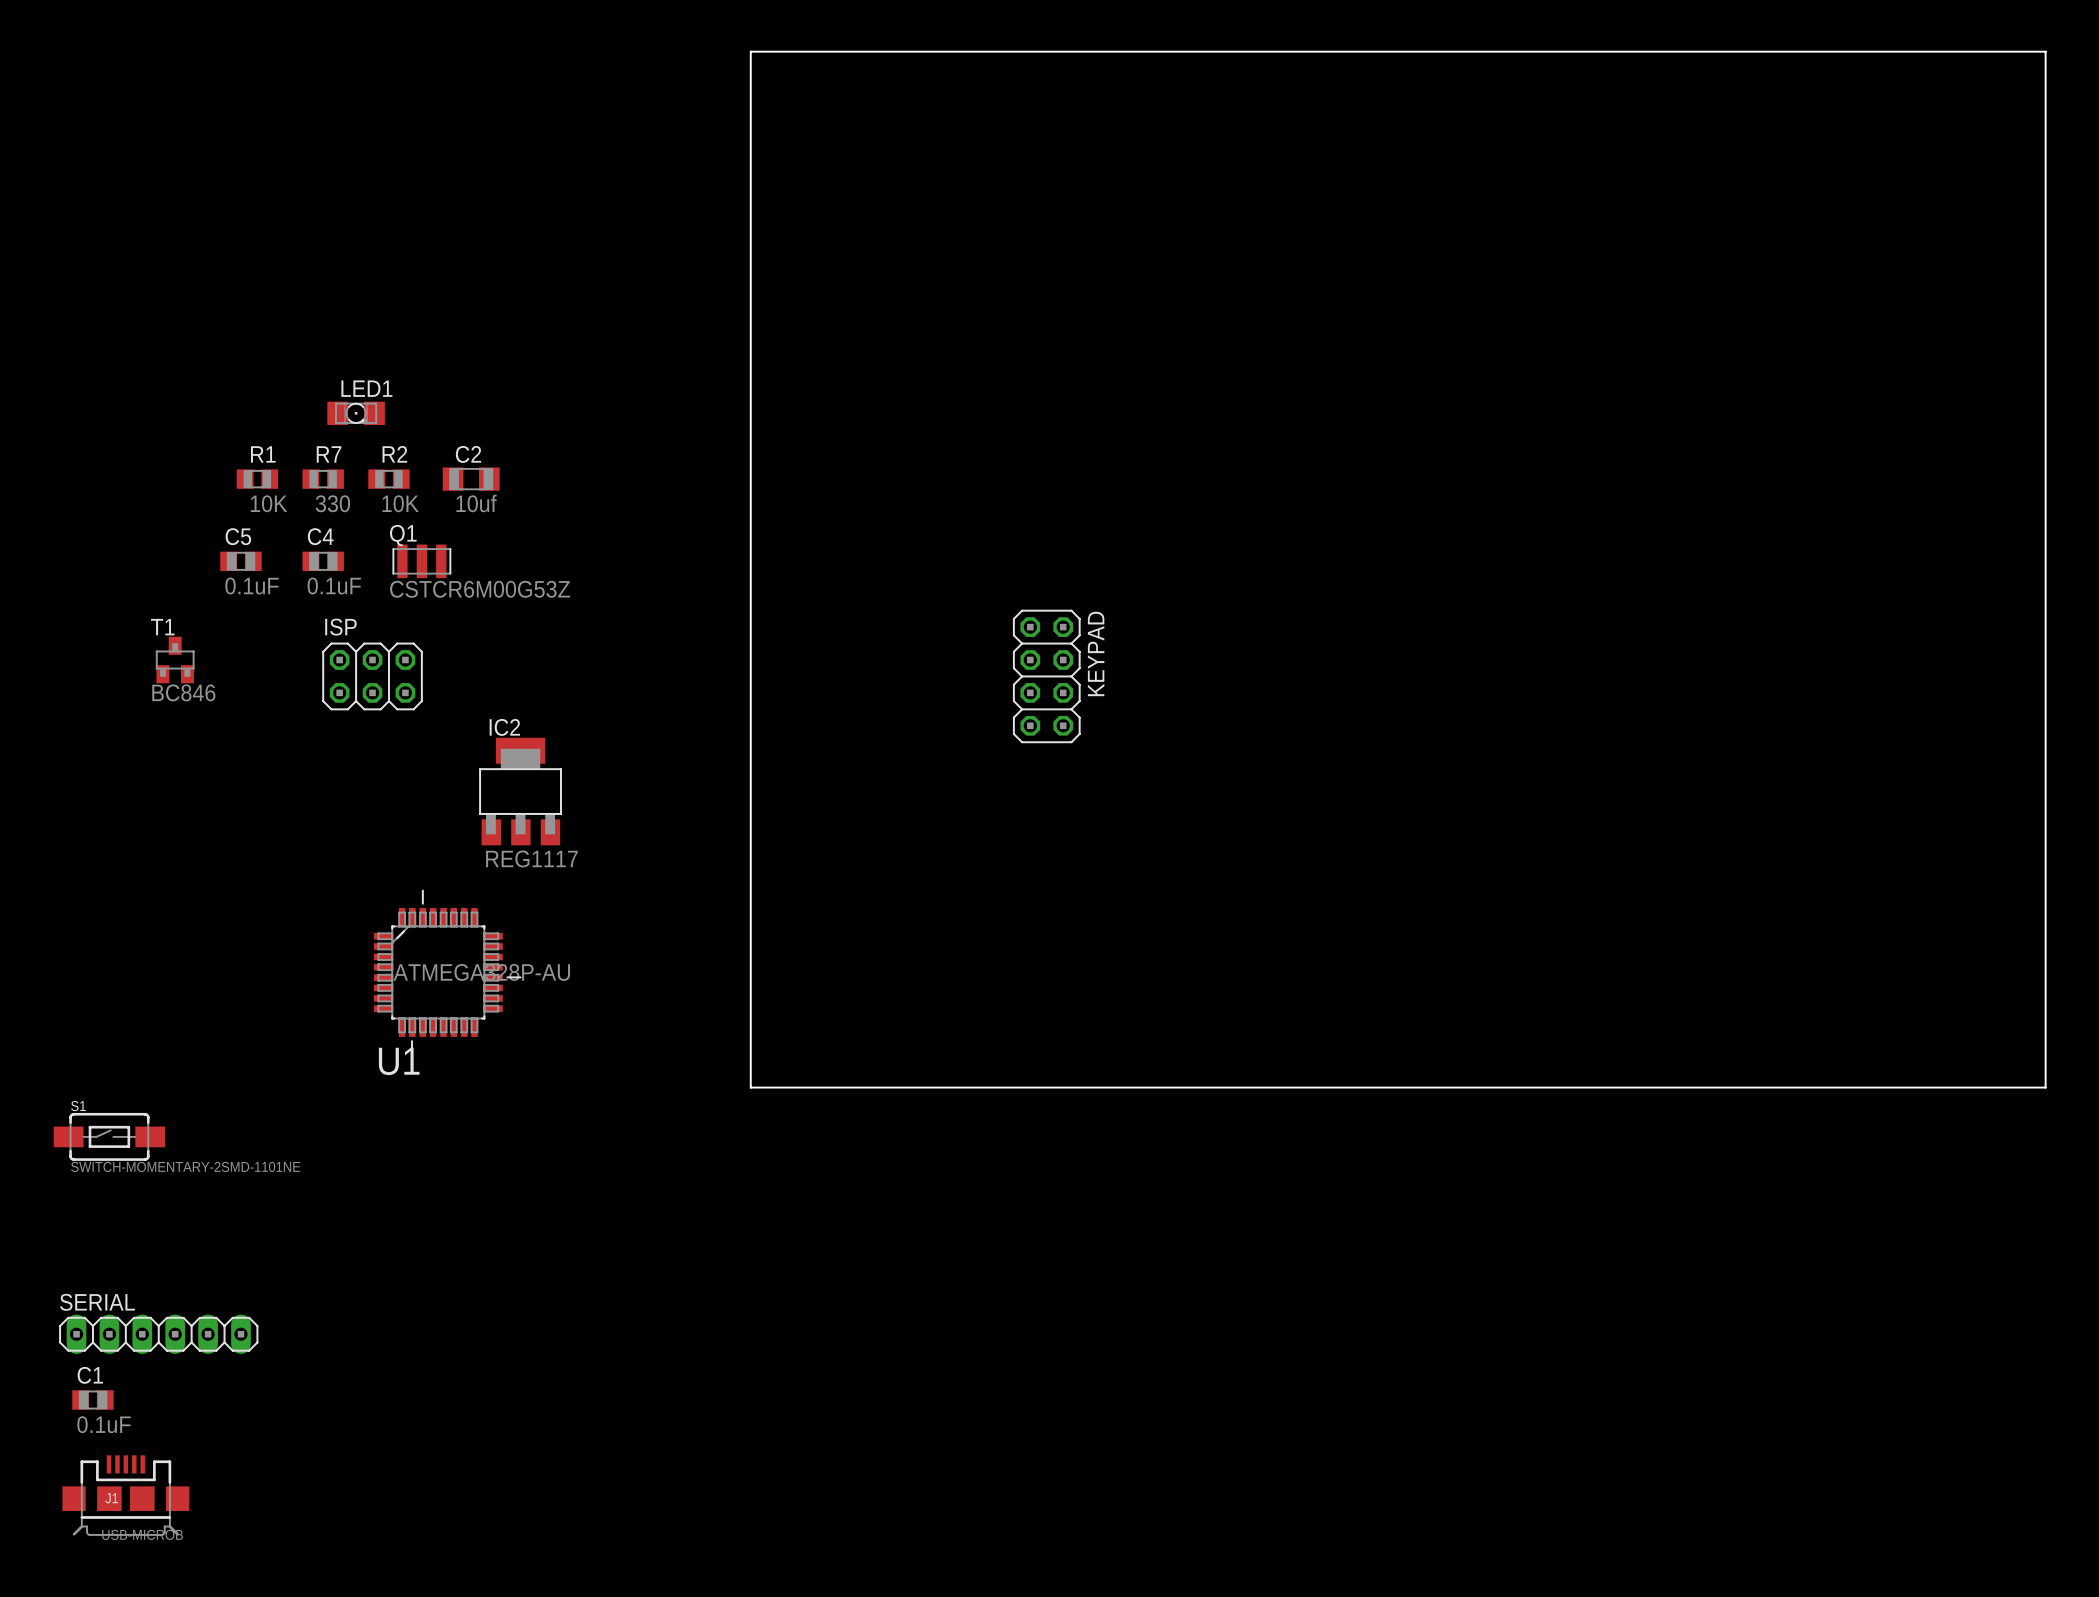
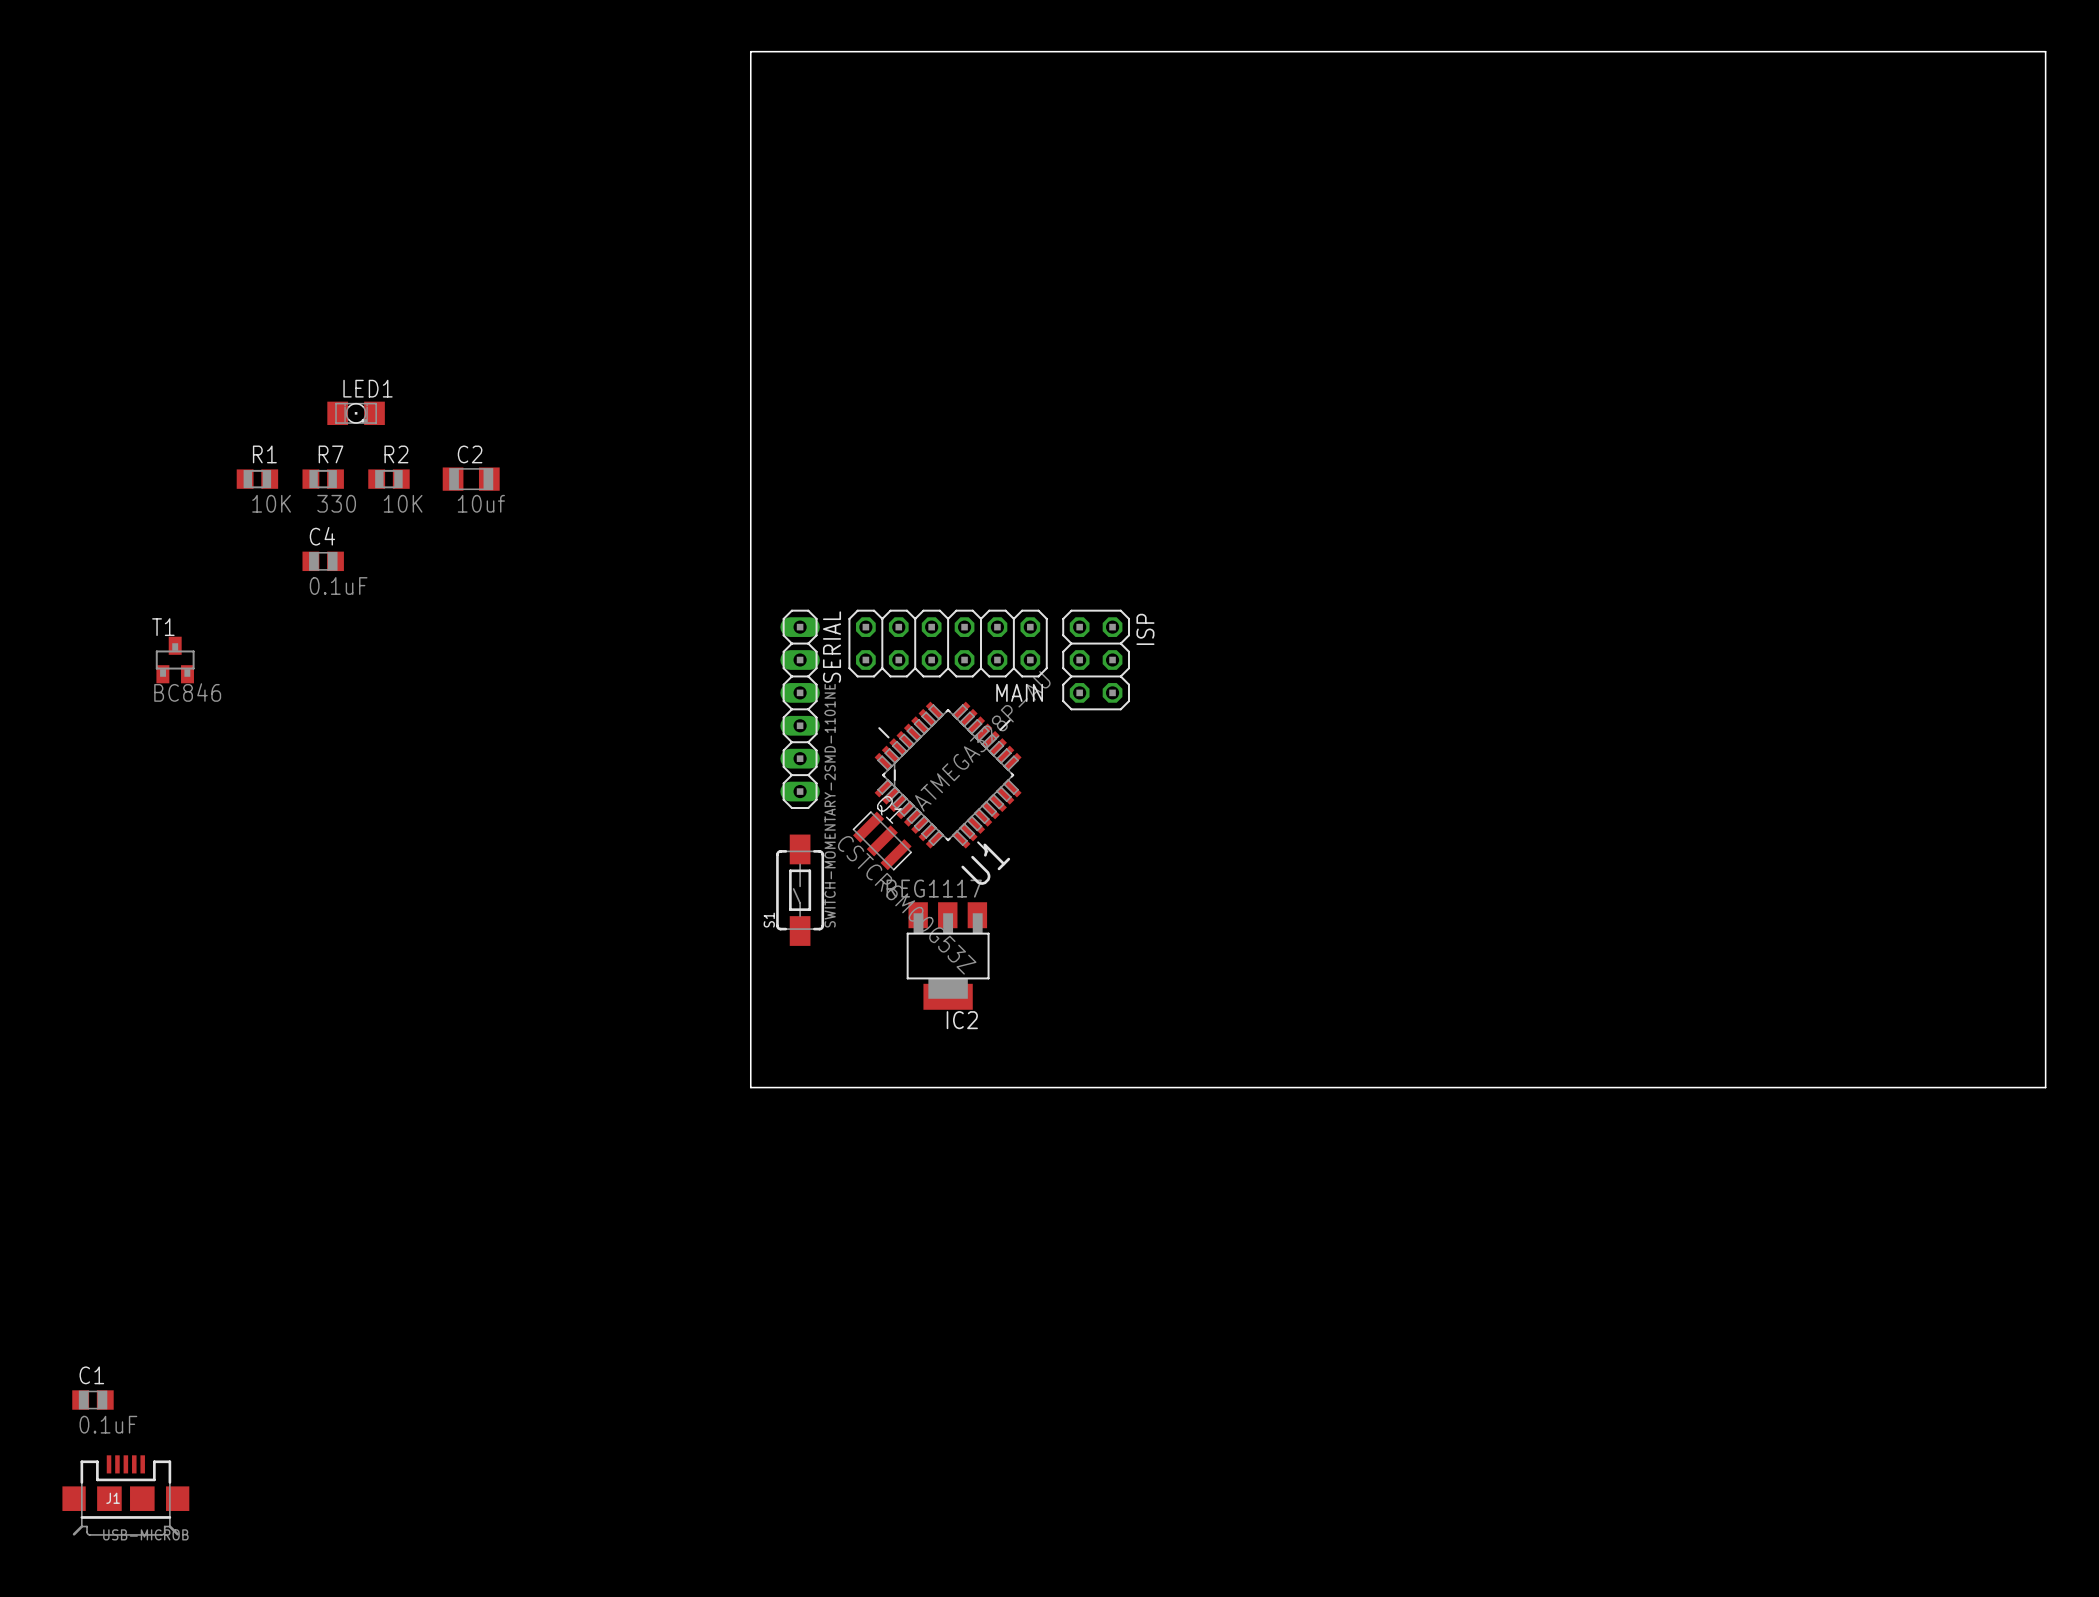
C5: 0.1uF (240, 561) -> none
Q1 rotation: 0° (421, 561) -> 45° clockwise (882, 840)
Q1 position: (421, 561) -> (882, 840)
MAIN: none -> (948, 643)
ISP: none -> (1096, 660)
ISP: (372, 676) -> none
KEYPAD: (1046, 676) -> none
SERIAL: none -> (800, 709)
IC2 rotation: 0° (520, 791) -> 180° (948, 956)
IC2 position: (520, 791) -> (948, 956)
U1 rotation: 0° (447, 972) -> 45° counterclockwise (948, 777)
U1 position: (447, 972) -> (948, 777)
S1 rotation: 0° (109, 1136) -> 90° counterclockwise (800, 890)
S1 position: (109, 1136) -> (800, 890)
SERIAL: (158, 1334) -> none

